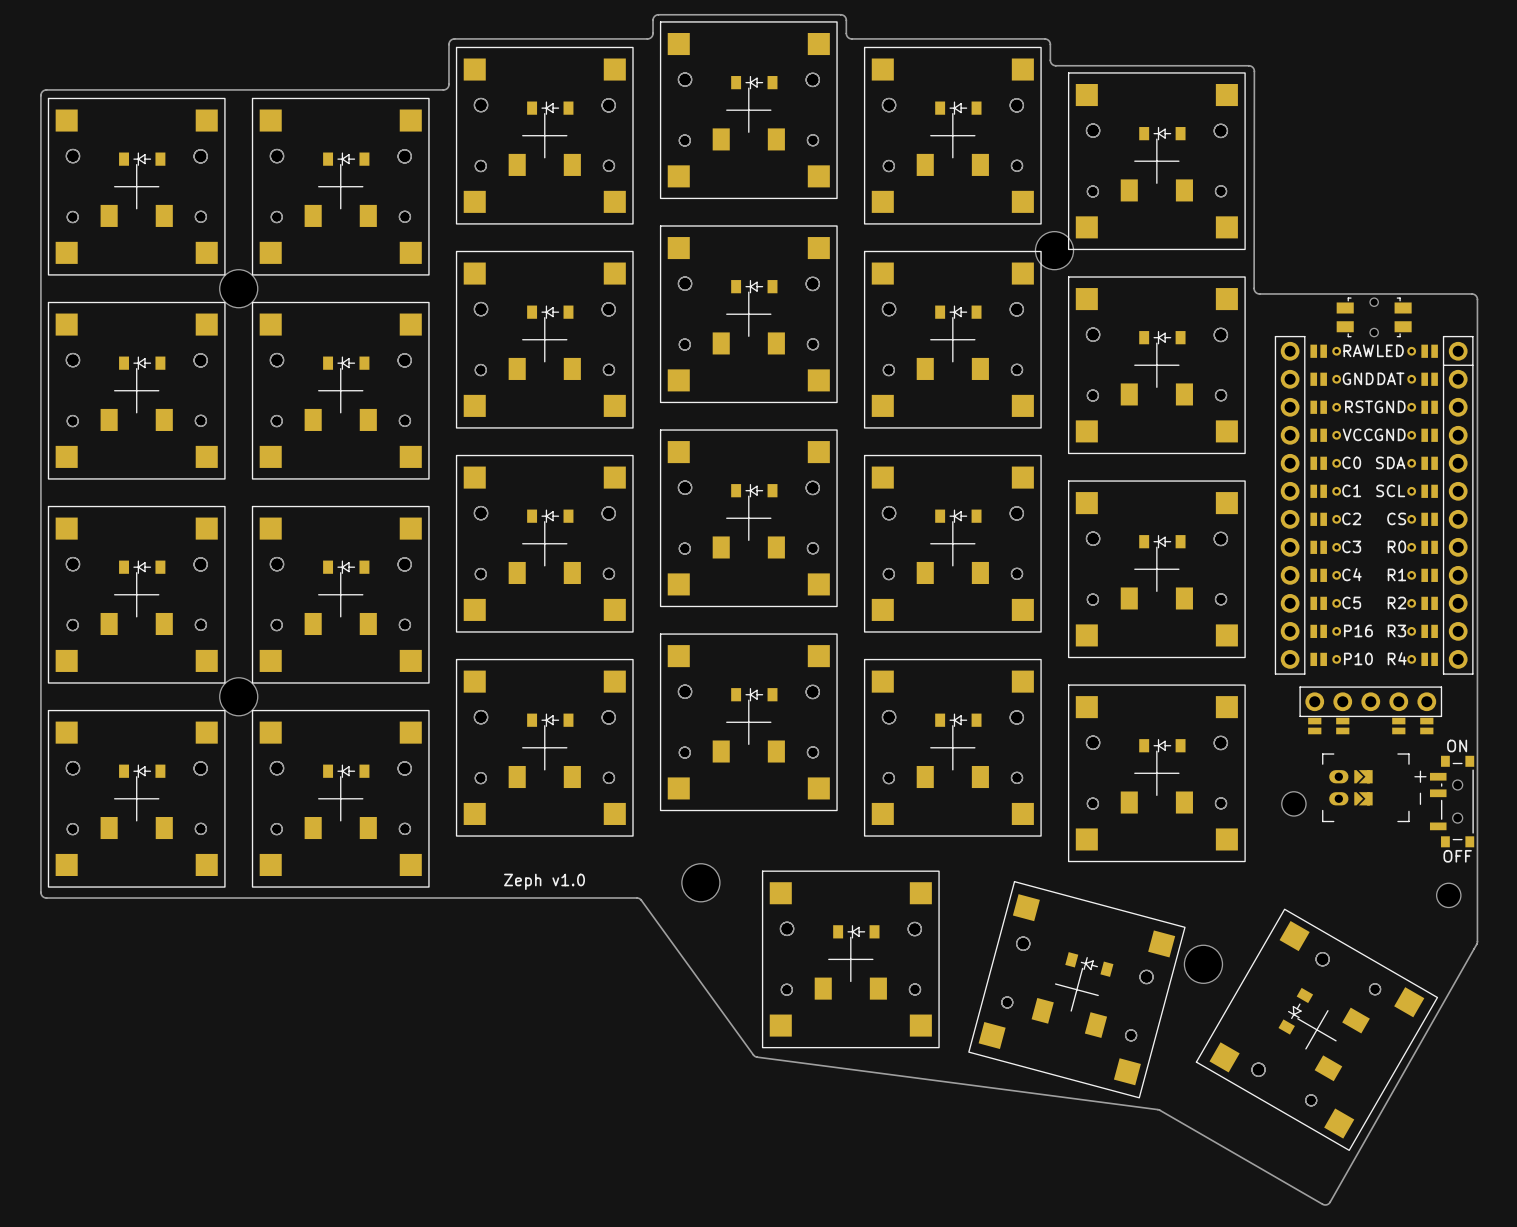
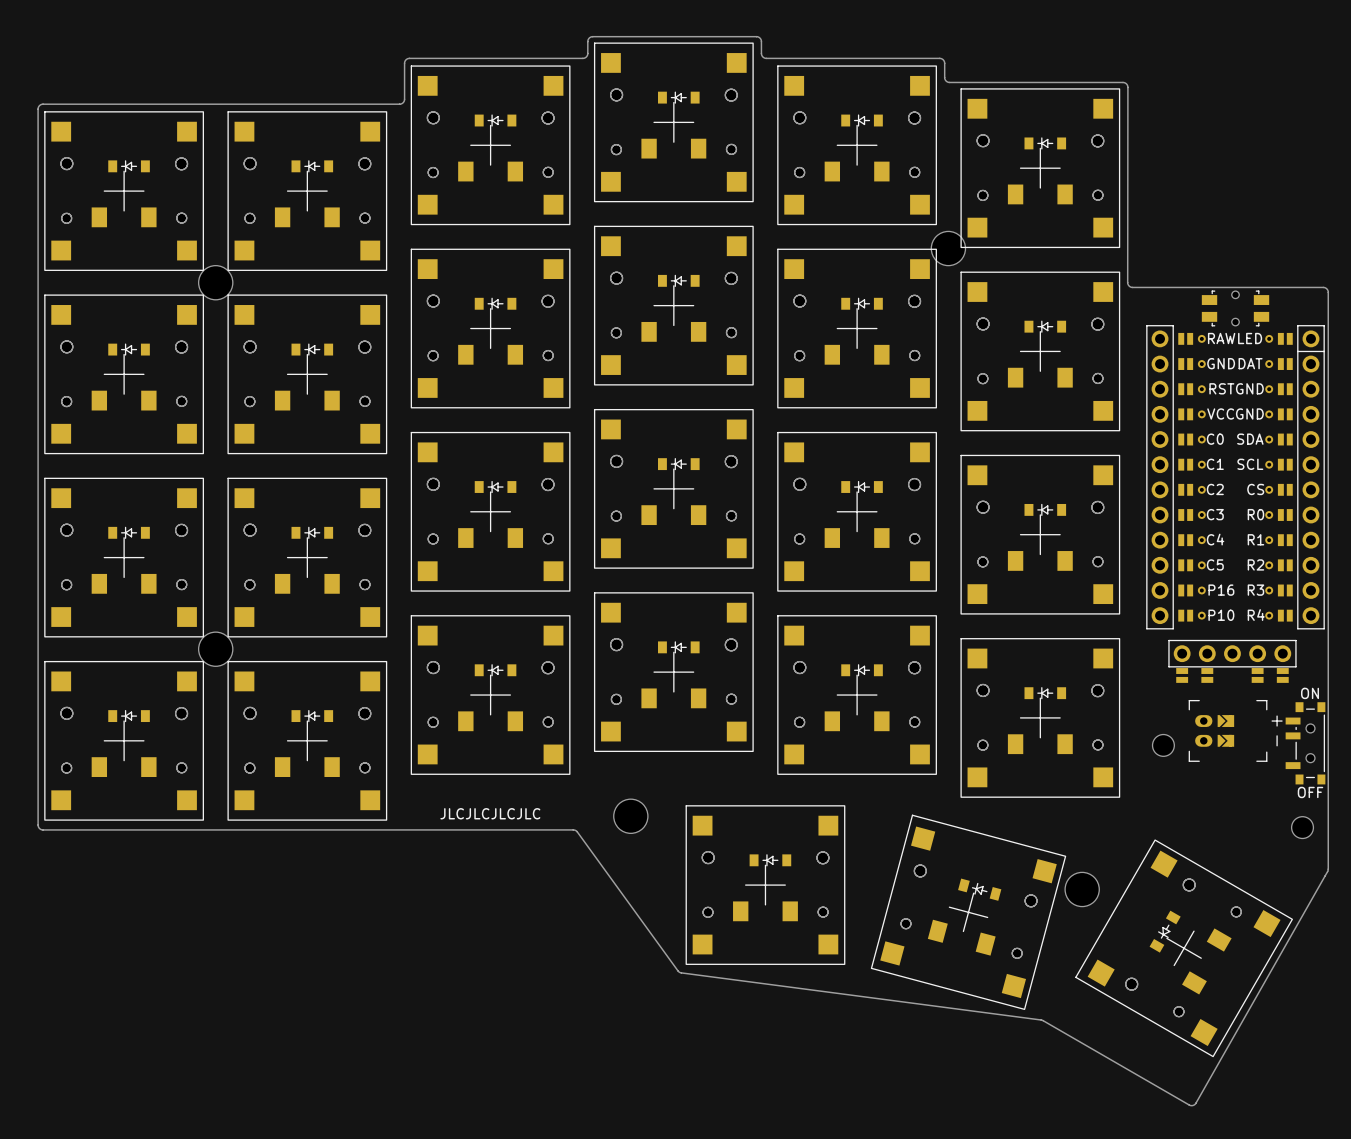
text: Zeph v1.0 (544, 881) -> JLCJLCJLCJLC (490, 813)

